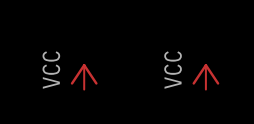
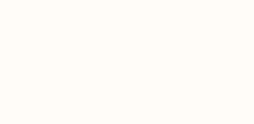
power symbol: VCC (84, 76) -> none
power symbol: VCC (205, 76) -> none

